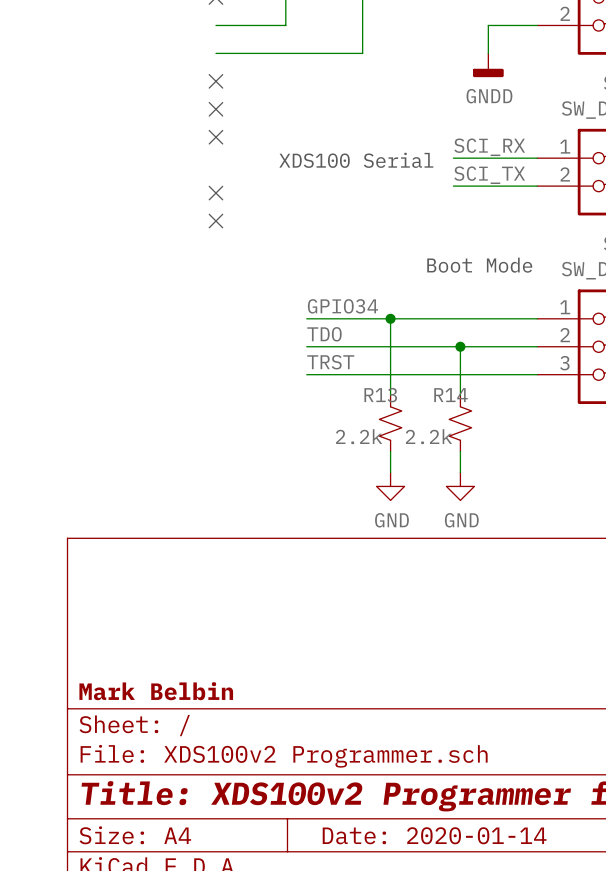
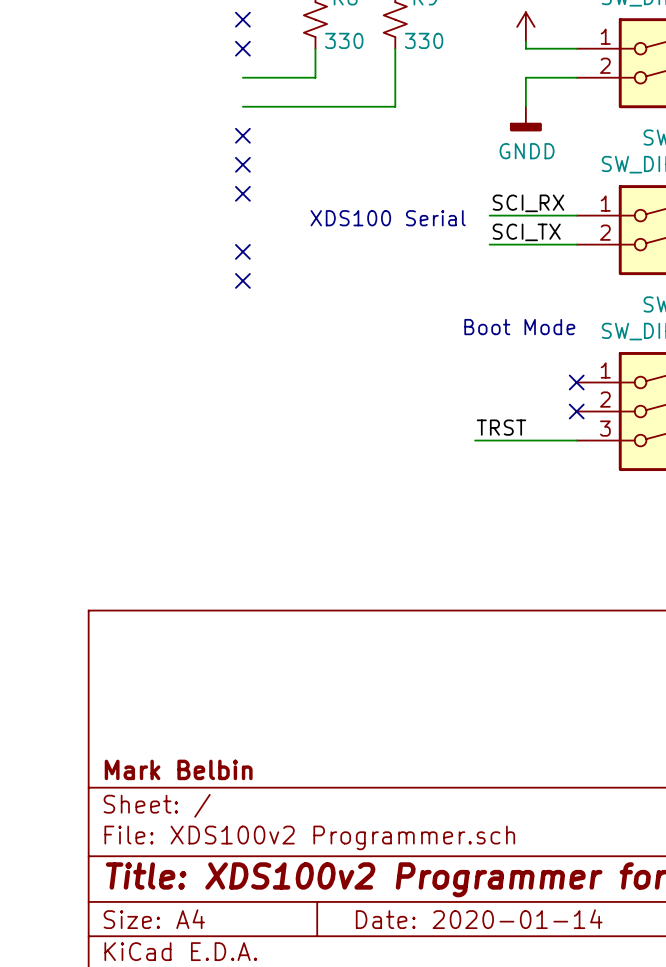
label: GPIO34 (342, 306) -> none
wire: (306, 318) (537, 318) -> none
wire: (390, 318) (390, 395) -> none
junction: (390, 318) -> none
no-connect mark: none -> (576, 382)
label: TDO (324, 334) -> none
wire: (306, 346) (537, 346) -> none
wire: (460, 346) (460, 395) -> none
junction: (460, 346) -> none
no-connect mark: none -> (576, 411)
label position: TRST (330, 362) -> TRST (501, 427)
wire: (306, 374) (439, 374) -> none
R13: 2.2k (390, 423) -> none
R14: 2.2k (460, 423) -> none
wire: (390, 451) (390, 472) -> none
wire: (460, 451) (460, 472) -> none
power symbol: GND (390, 486) -> none
power symbol: GND (460, 486) -> none

